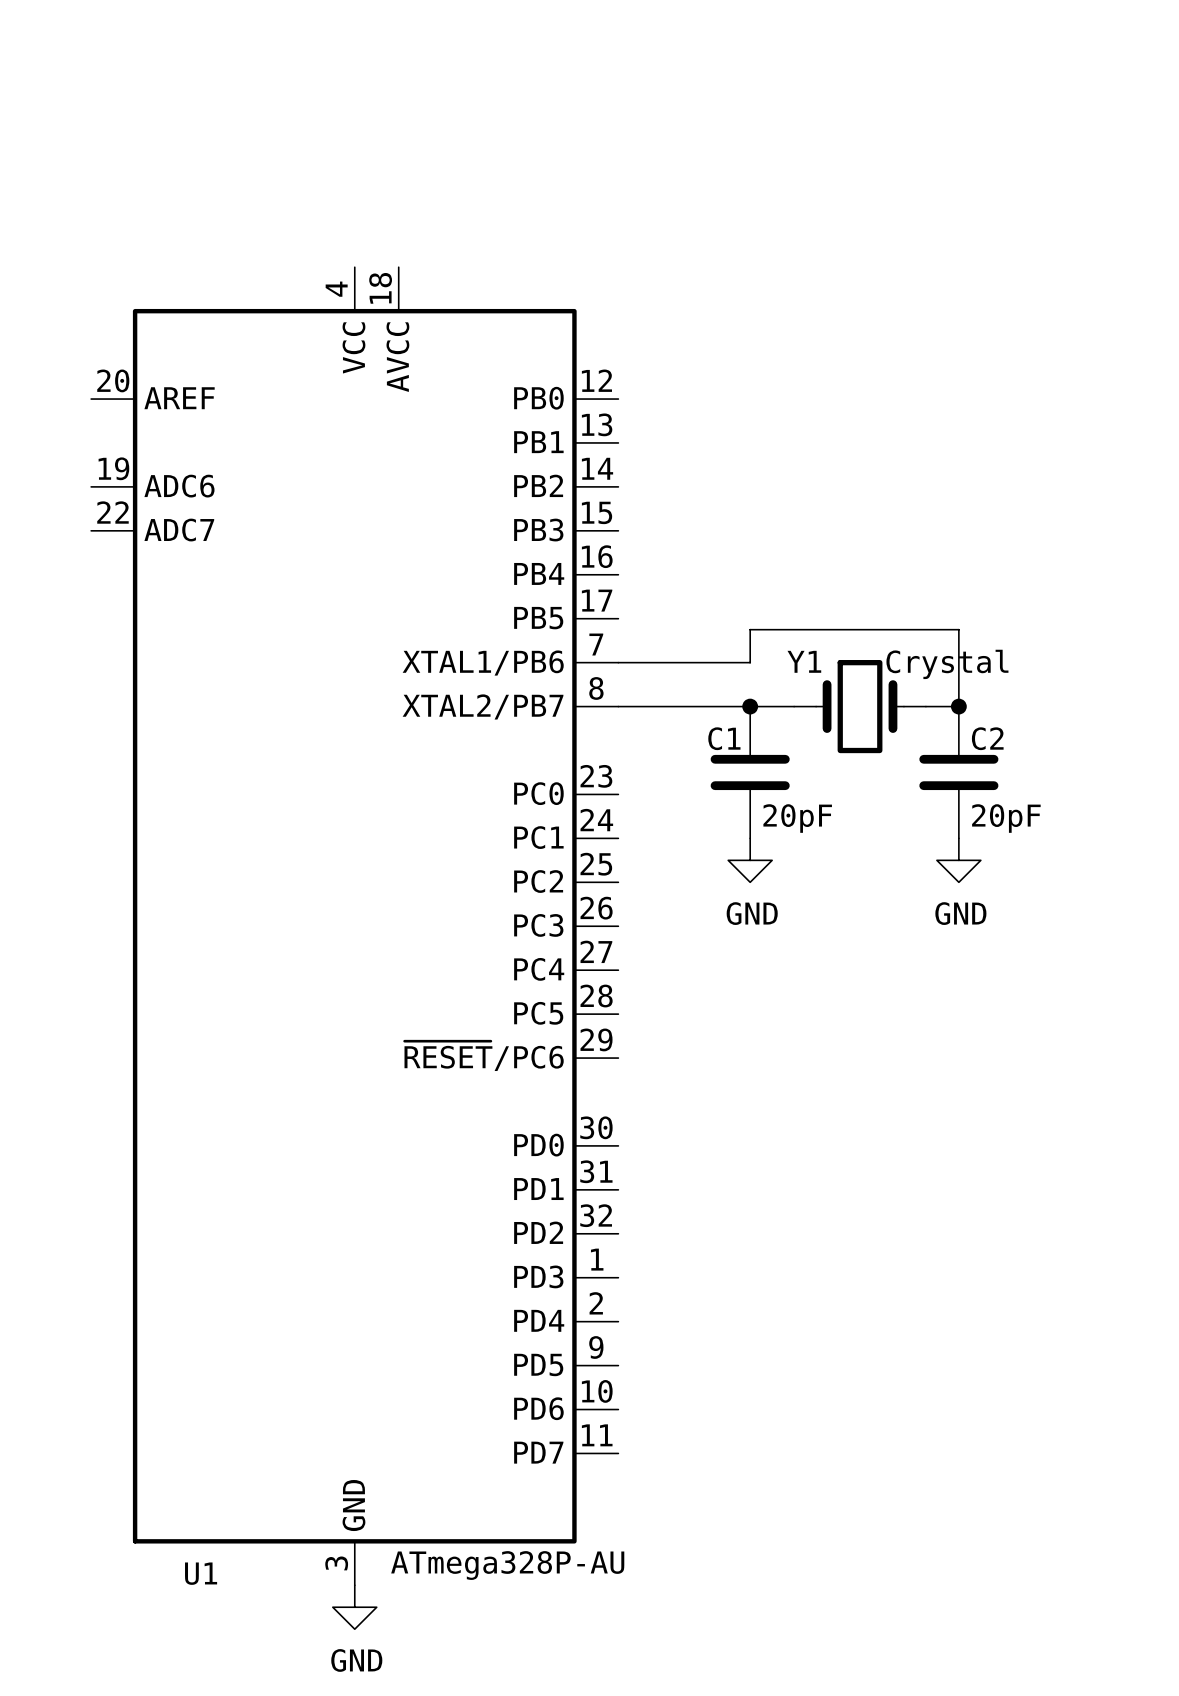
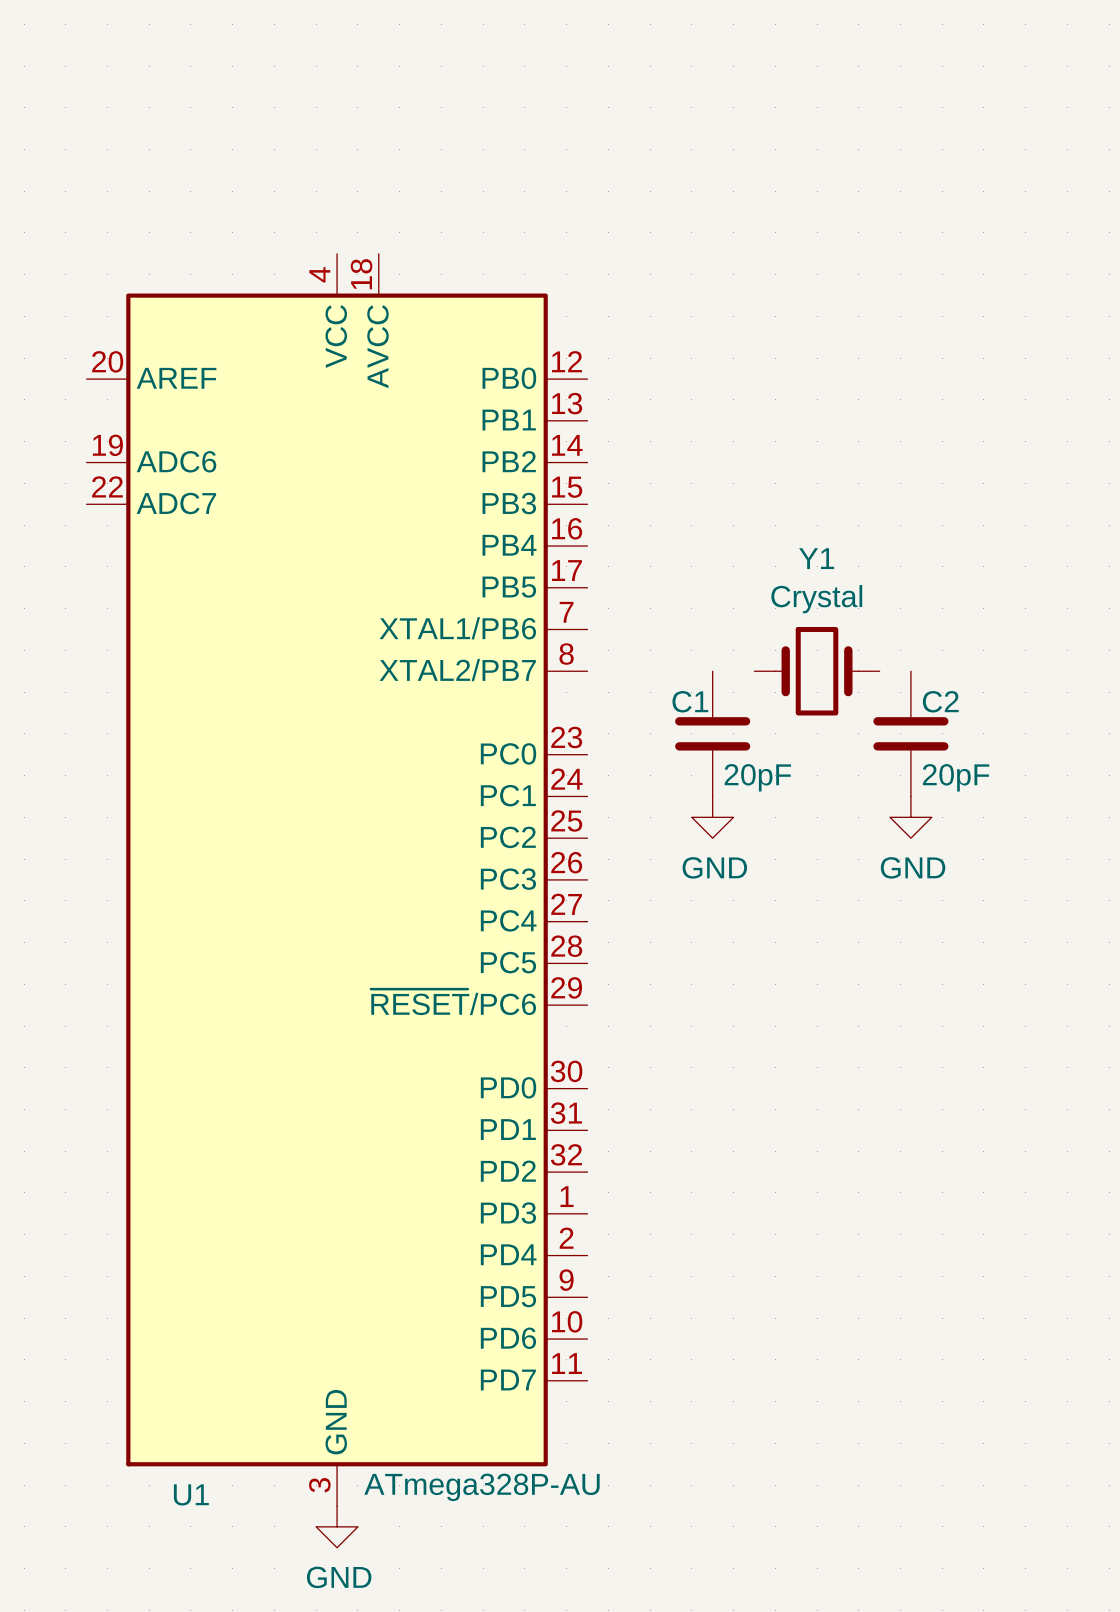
Y1 name position: Y1 (804, 661) -> Y1 (816, 558)
wire: (618, 662) (750, 662) (750, 629) (958, 629) (958, 706) (925, 706) -> none
Y1 value position: Crystal (947, 664) -> Crystal (816, 599)
wire: (618, 706) (794, 706) -> none
junction: (750, 706) -> none
junction: (958, 706) -> none

